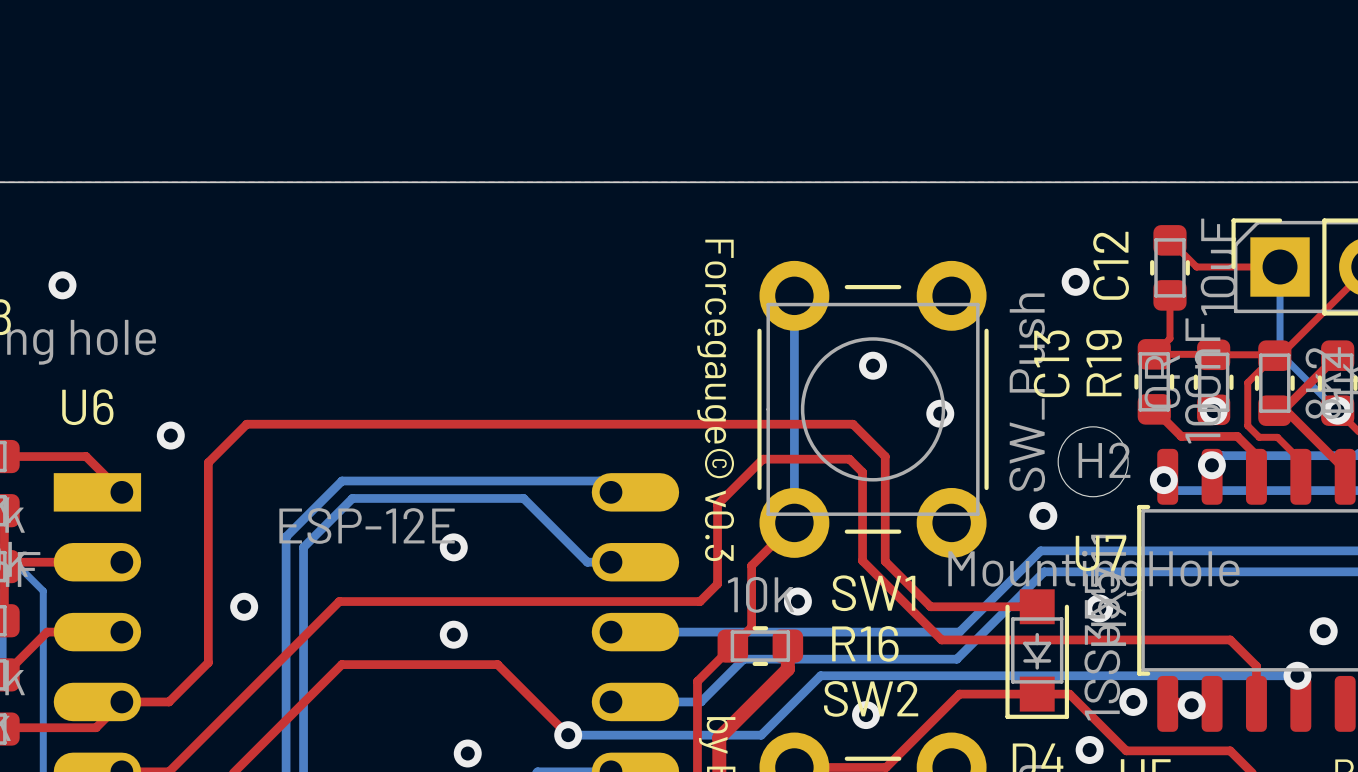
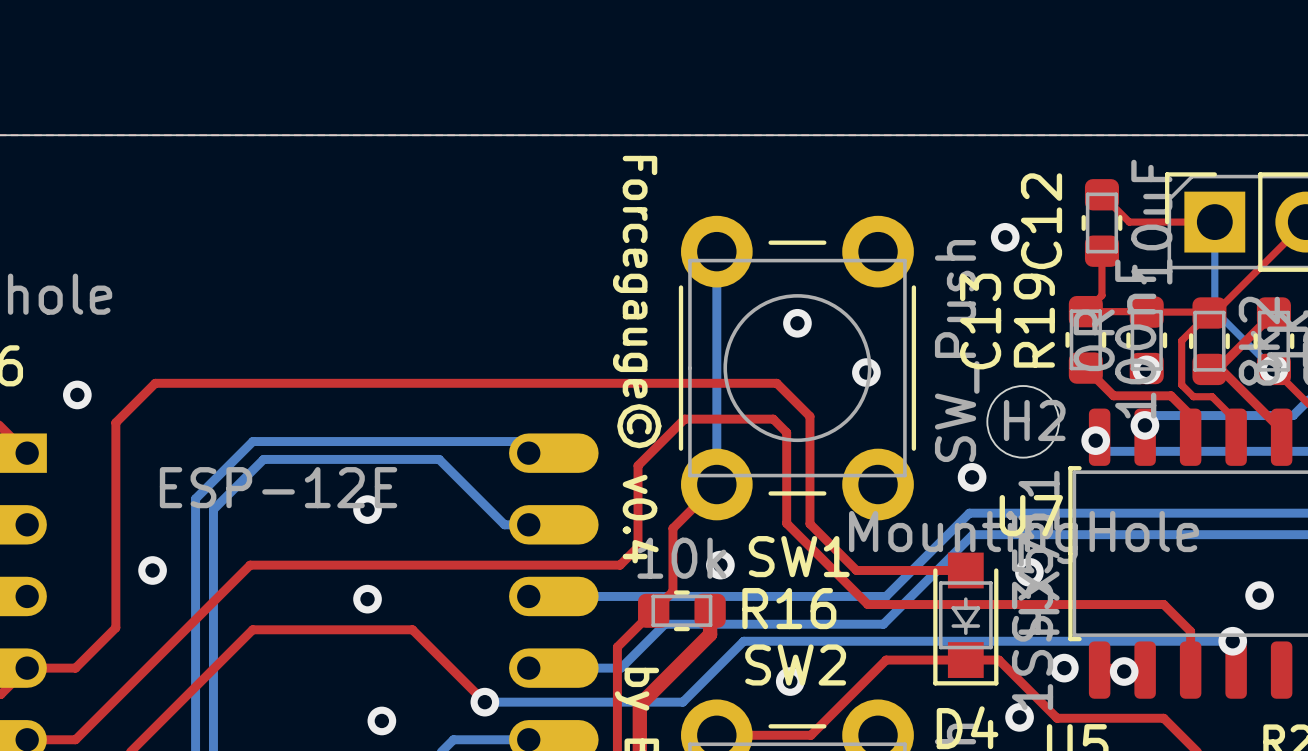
text: Forcegauge© v0.3 (715, 400) -> Forcegauge© v0.4 (637, 359)

